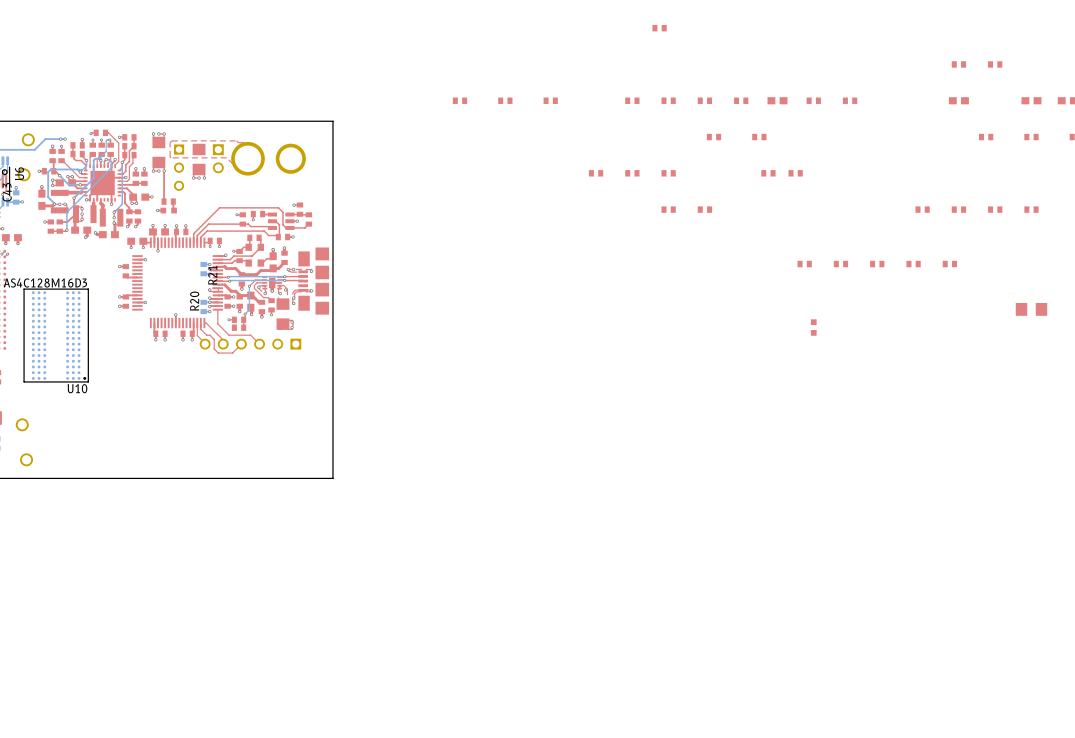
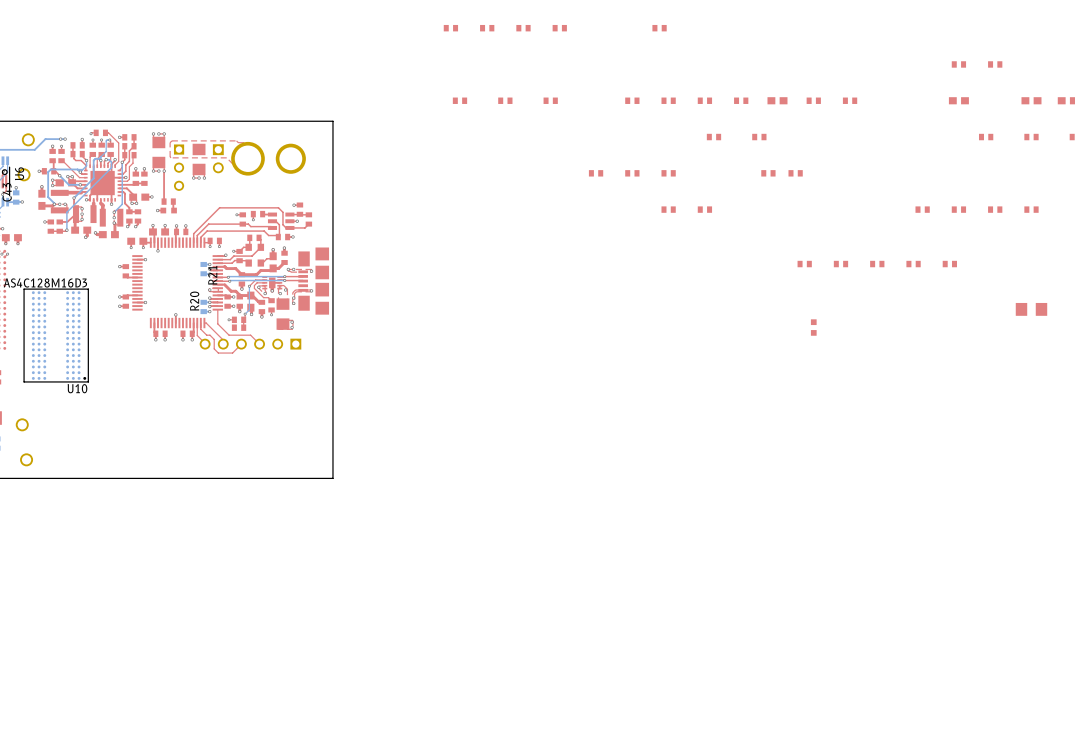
part: none -> (450, 28)
part: none -> (487, 28)
part: none -> (523, 28)
part: none -> (559, 28)

